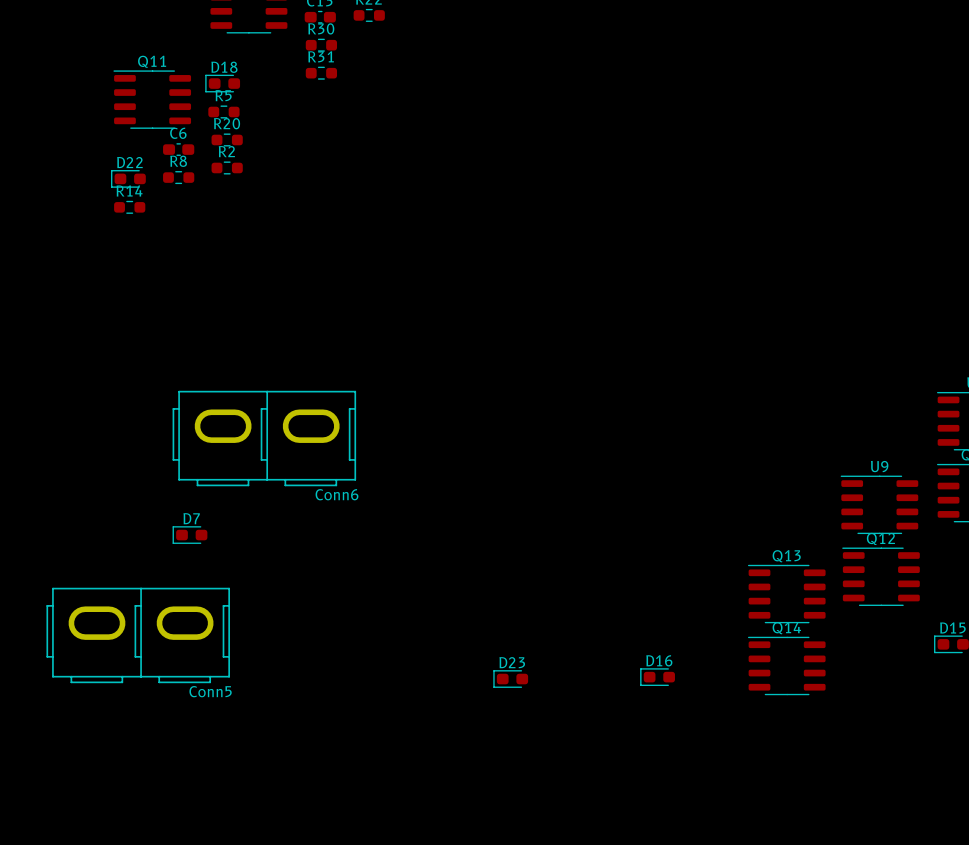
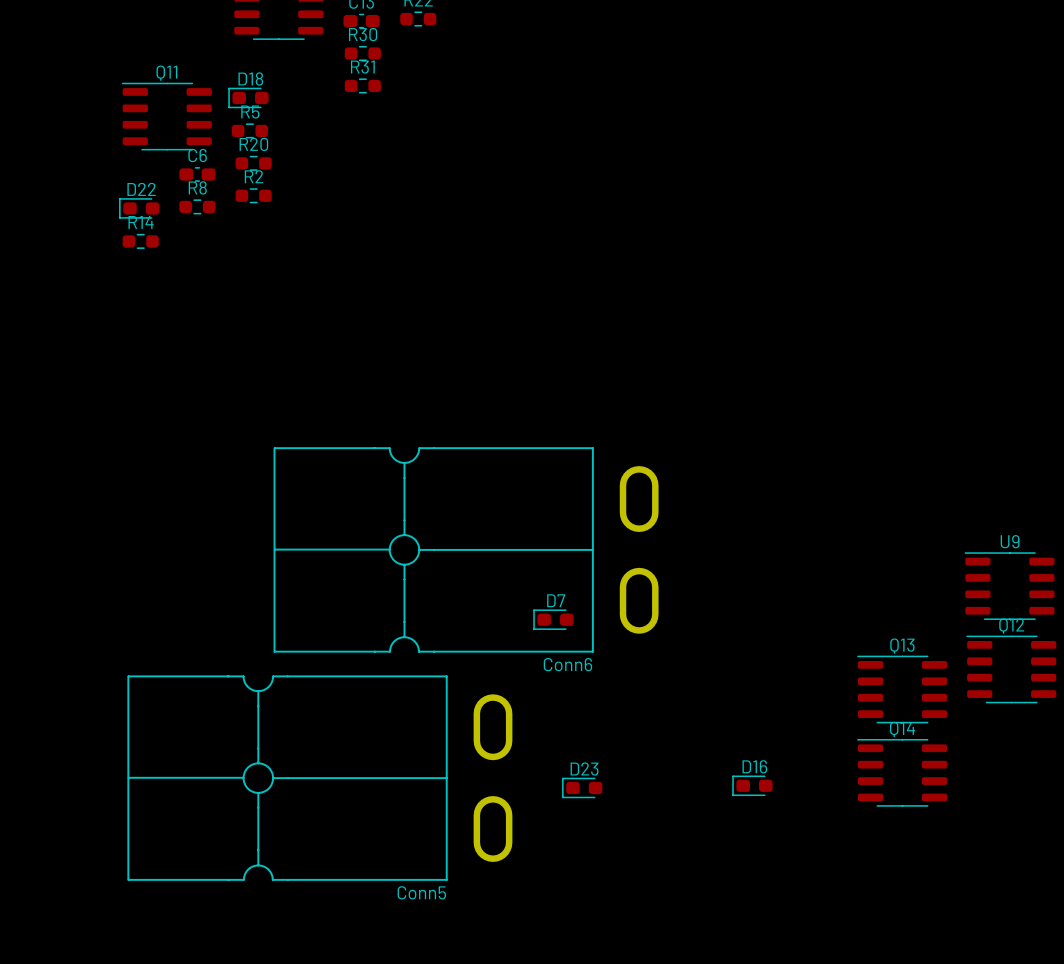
Conn6 footprint: [172, 390, 357, 487] -> [273, 447, 659, 653]
Conn6 name position: Conn6 (336, 494) -> Conn6 (567, 664)
D7 position: (189, 535) -> (553, 619)
Conn5 footprint: [46, 587, 230, 684] -> [127, 675, 513, 881]
Conn5 name position: Conn5 (210, 691) -> Conn5 (421, 892)

